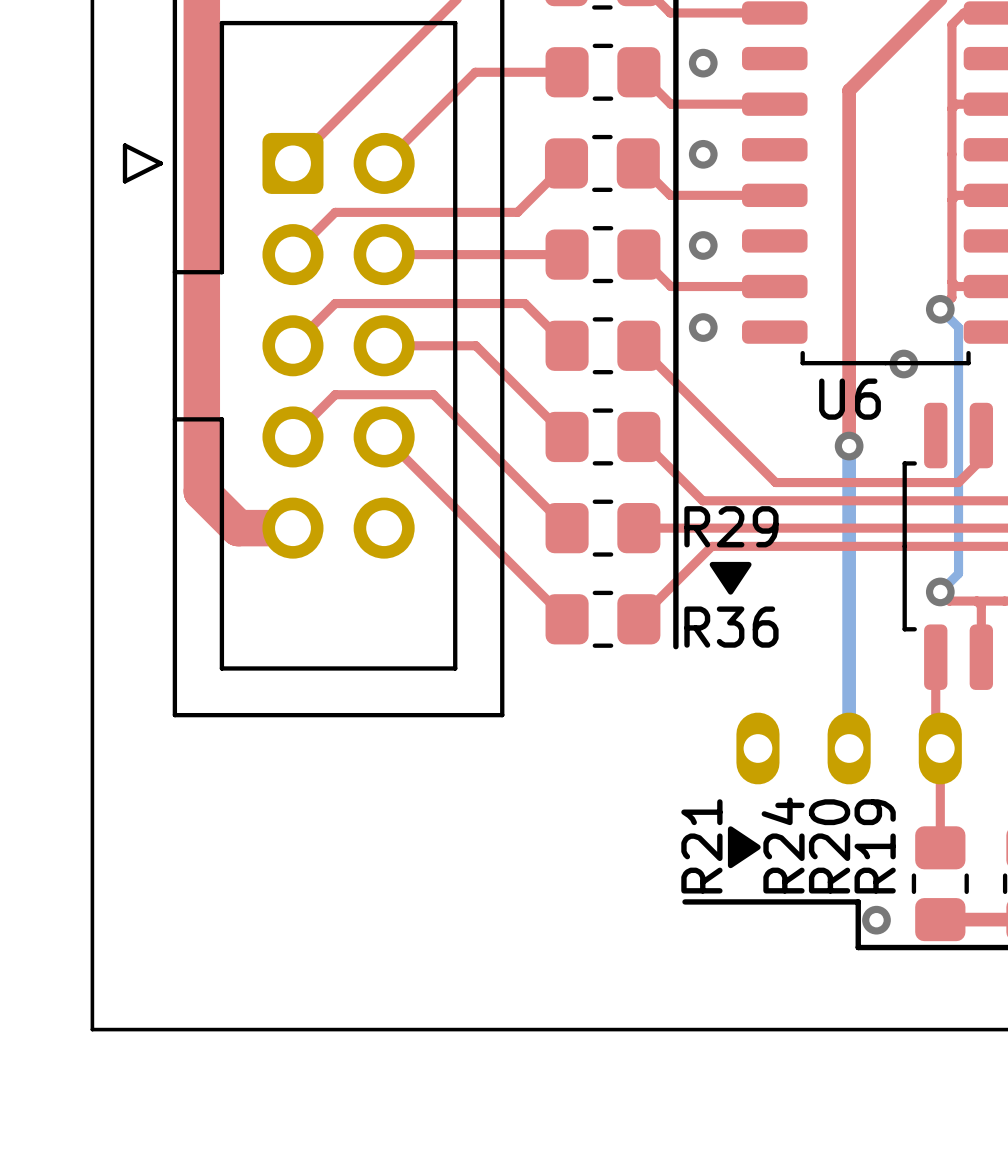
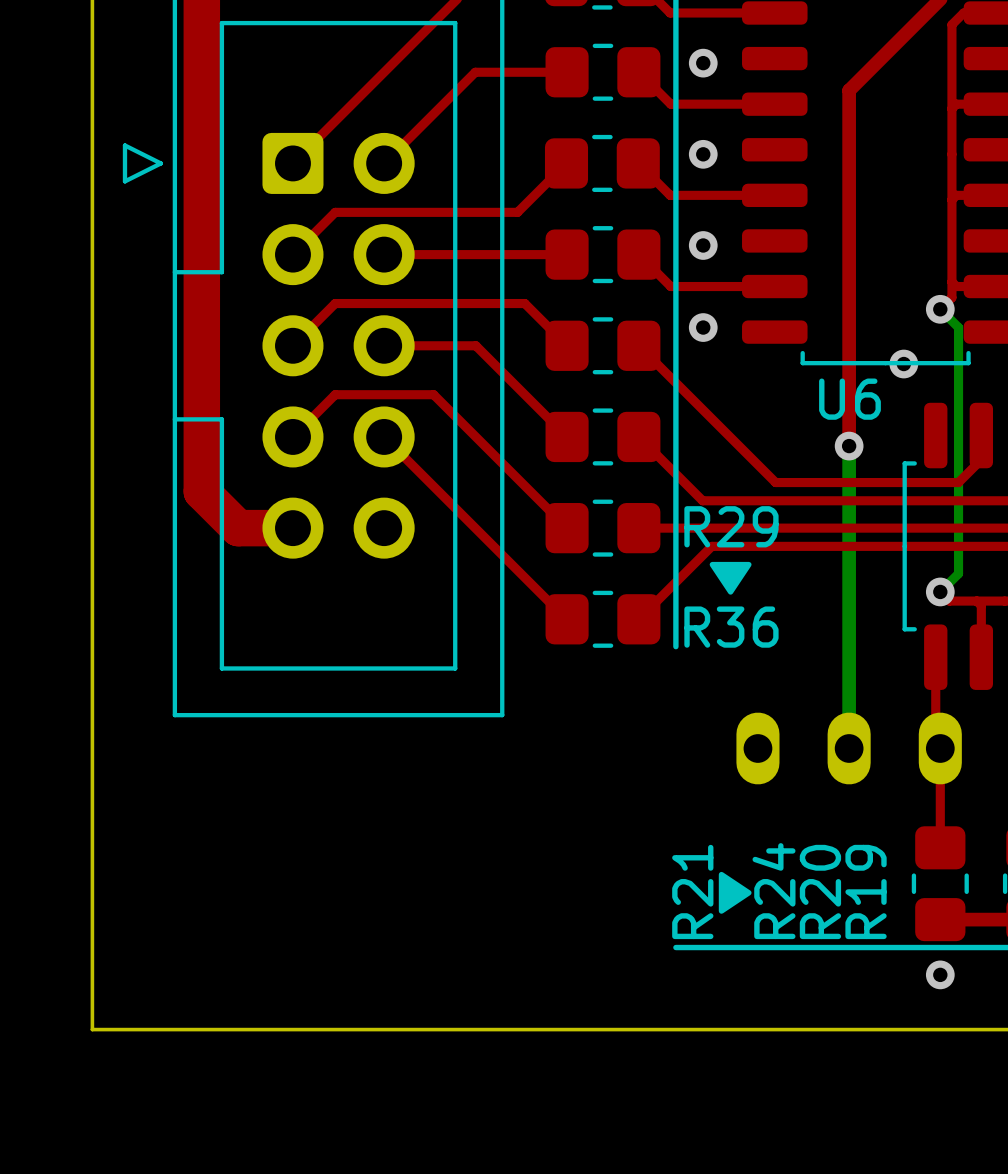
R24 name position: R24 (783, 845) -> R24 (774, 891)
R21 name position: R21 (701, 846) -> R21 (692, 891)
R20 name position: R20 (829, 846) -> R20 (820, 891)
R19 name position: R19 (875, 846) -> R19 (866, 891)
drawing position: (744, 847) -> (735, 892)
line: (685, 901) (858, 901) (858, 947) -> (675, 947) (858, 947)
via: (876, 920) -> none
via: none -> (940, 974)

